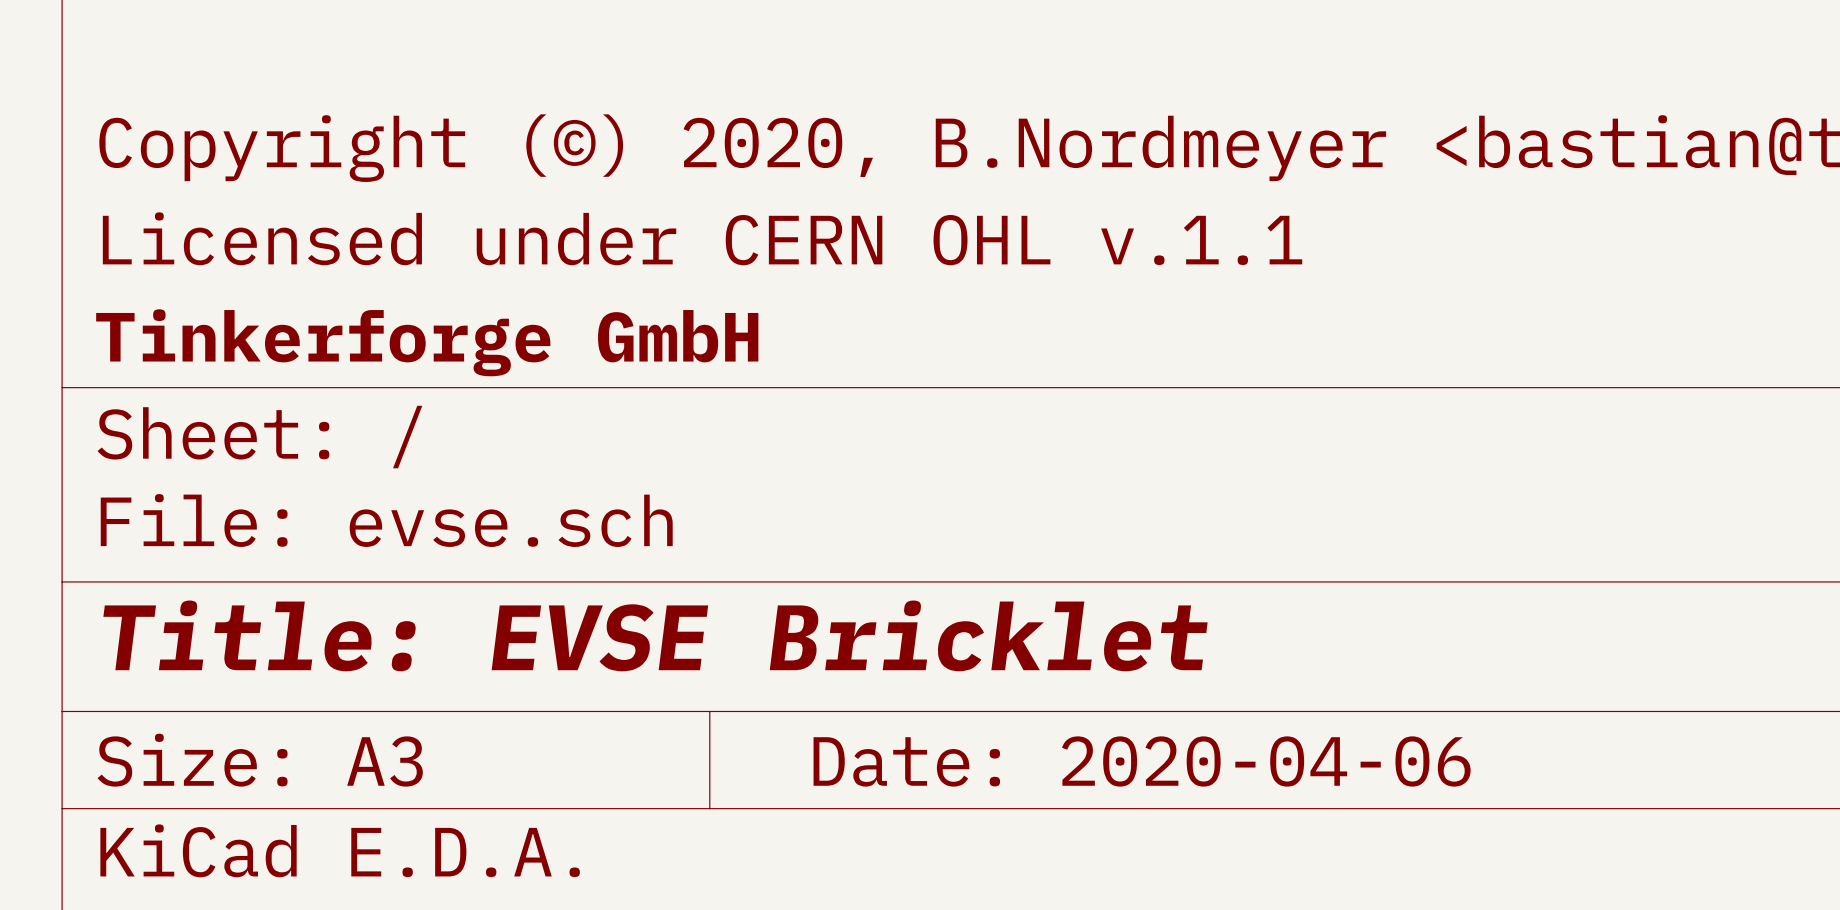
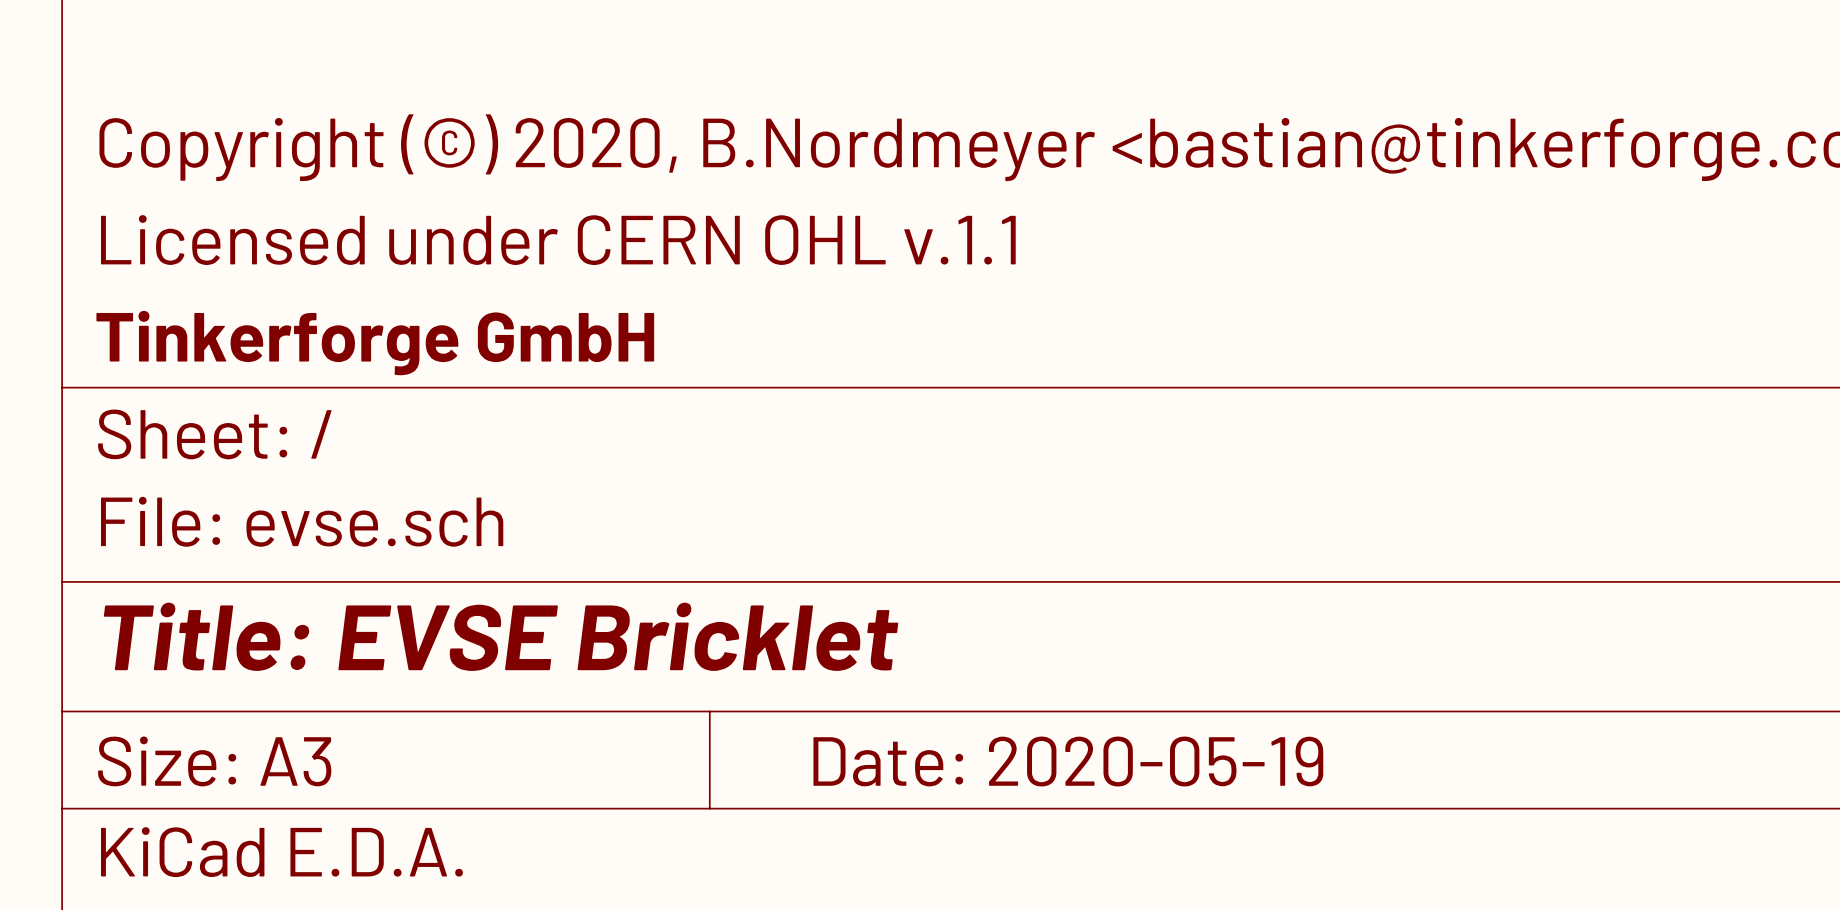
title block: Date: 2020-04-06 (1142, 761) -> Date: 2020-05-19 (1068, 761)

